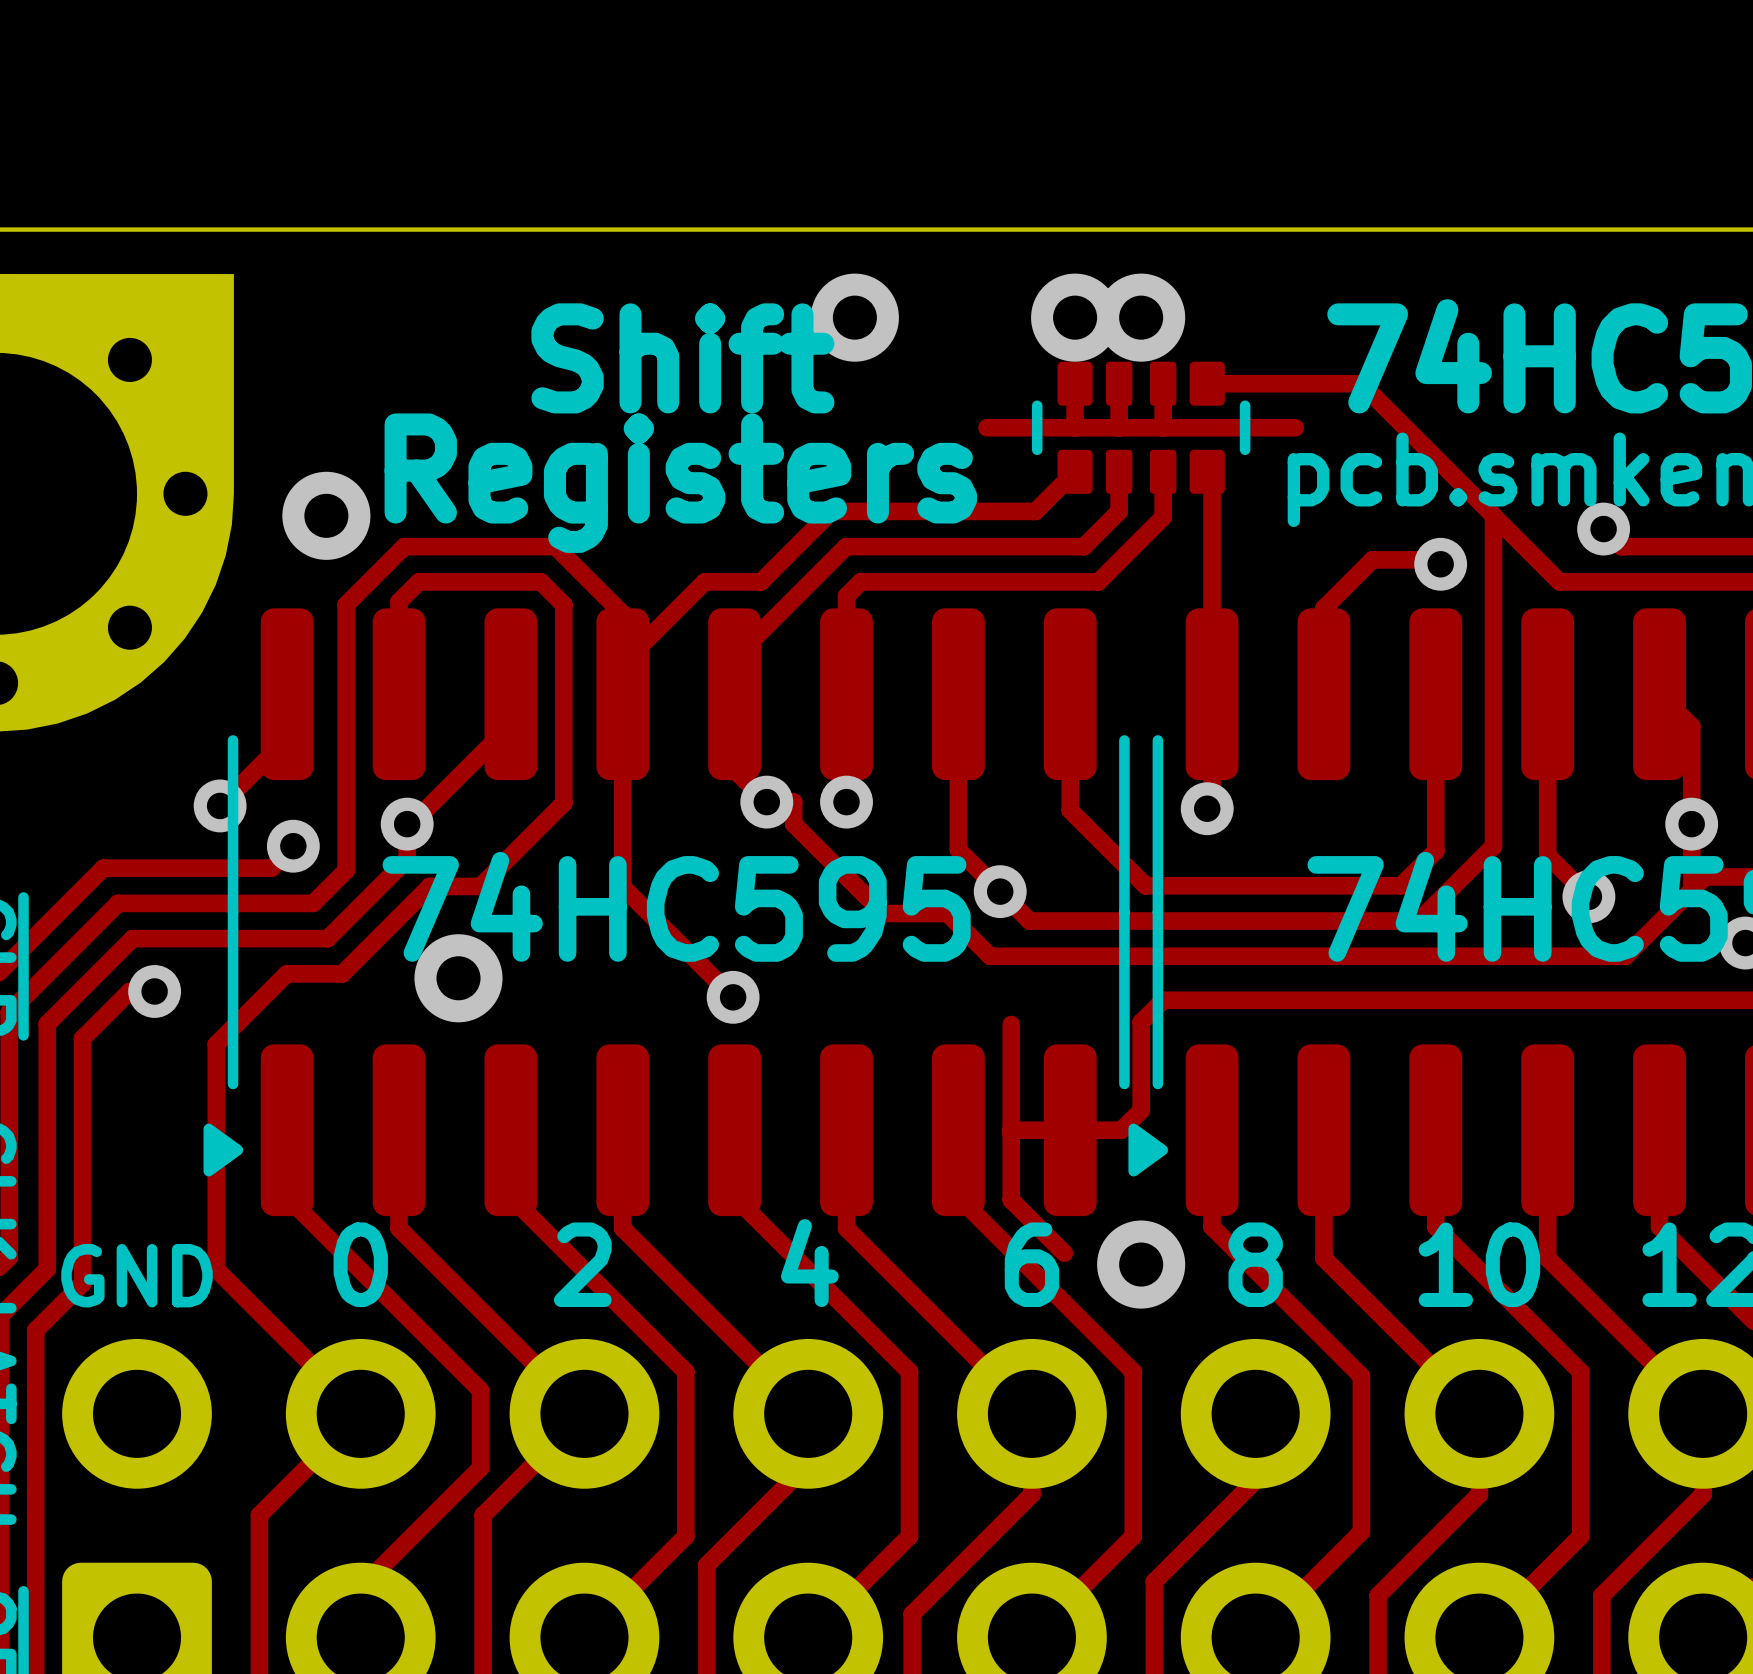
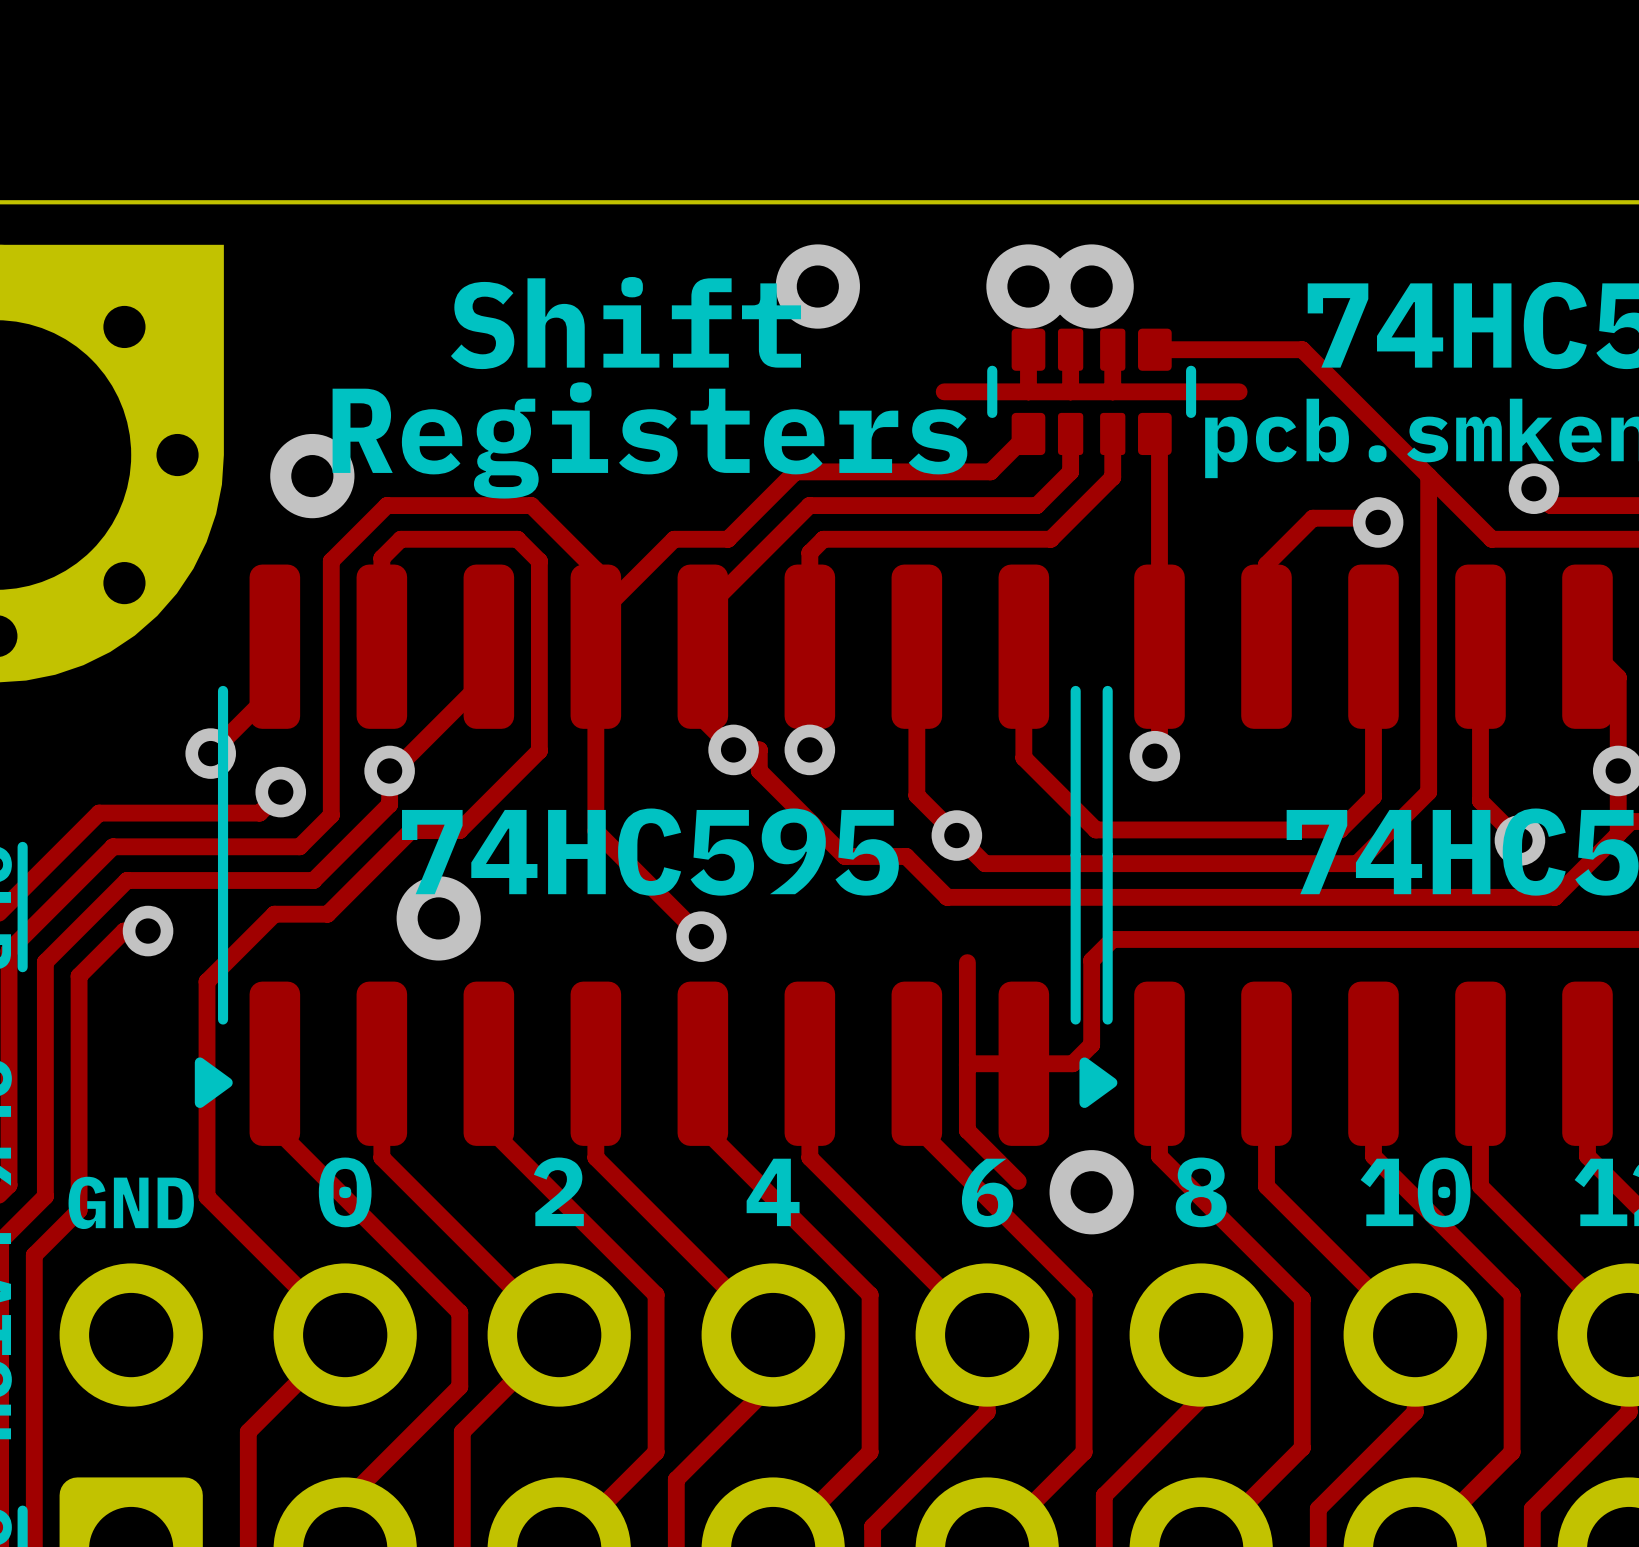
text position: Shift (682, 358) -> Shift (625, 323)

